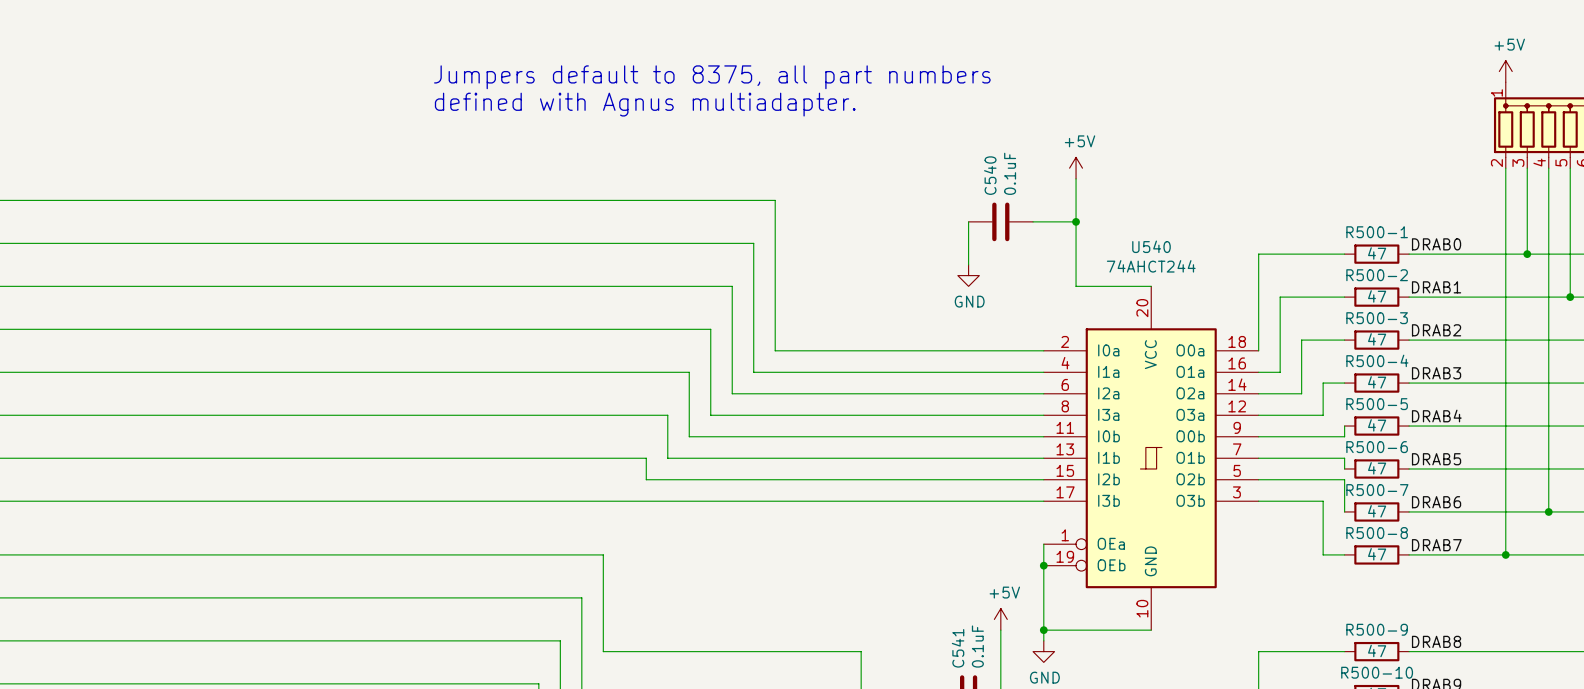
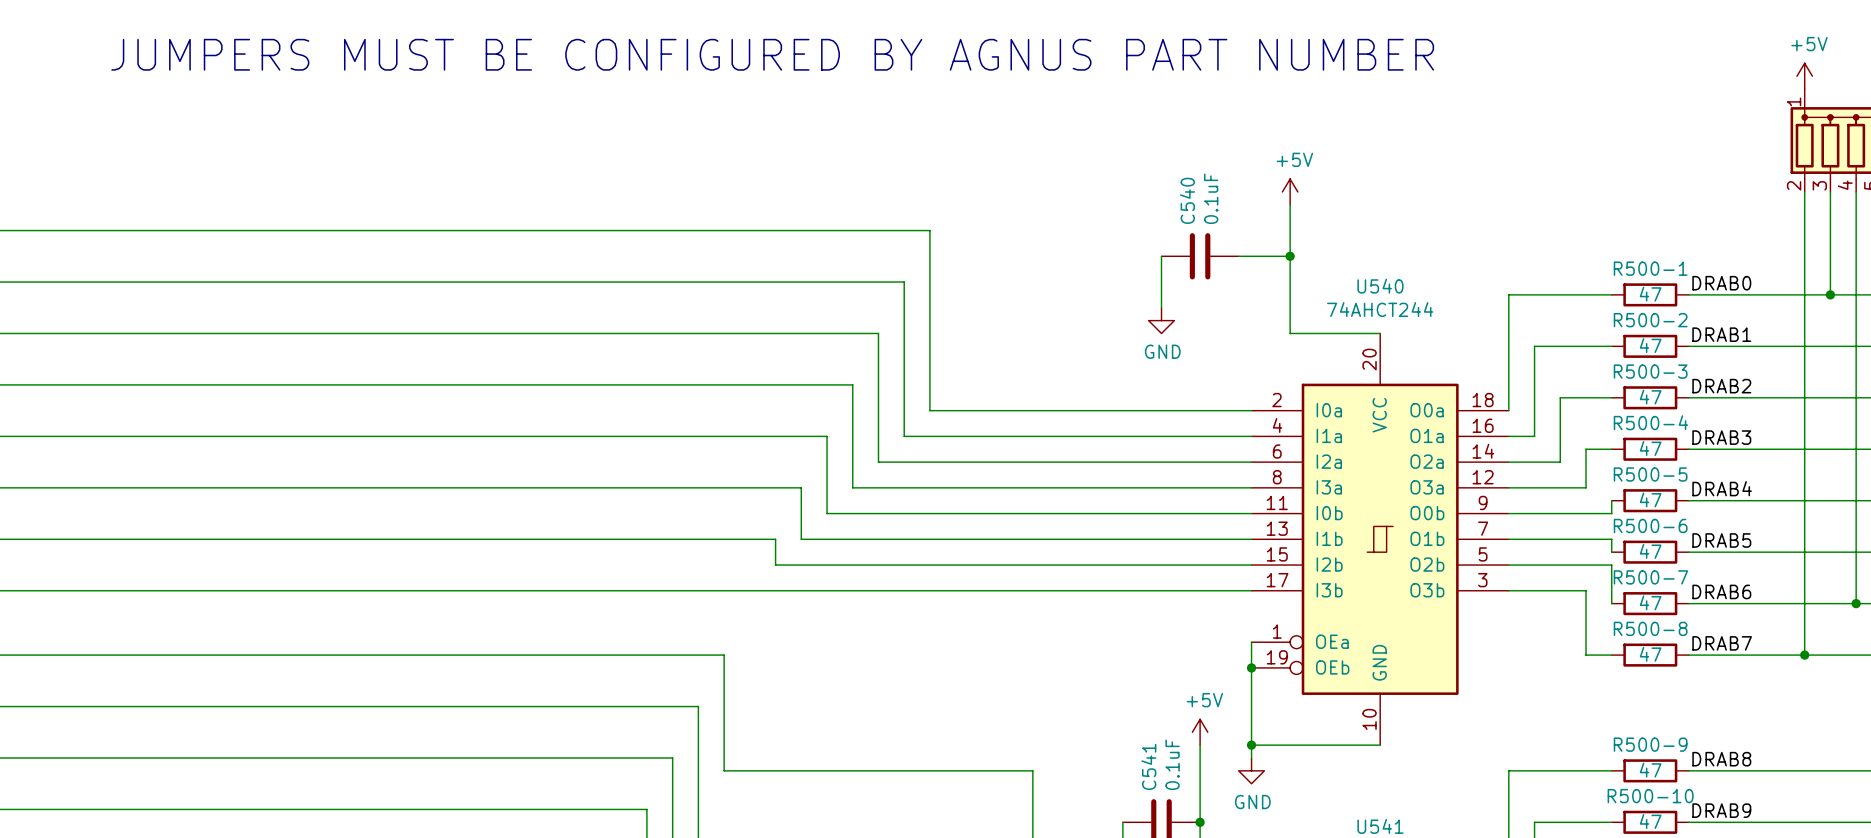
text: none -> JUMPERS MUST BE CONFIGURED BY AGNUS PART NUMBER (772, 54)
text: Jumpers default to 8375, all part numbers (712, 77) -> none
text: defined with Agnus multiadapter. (645, 104) -> none

